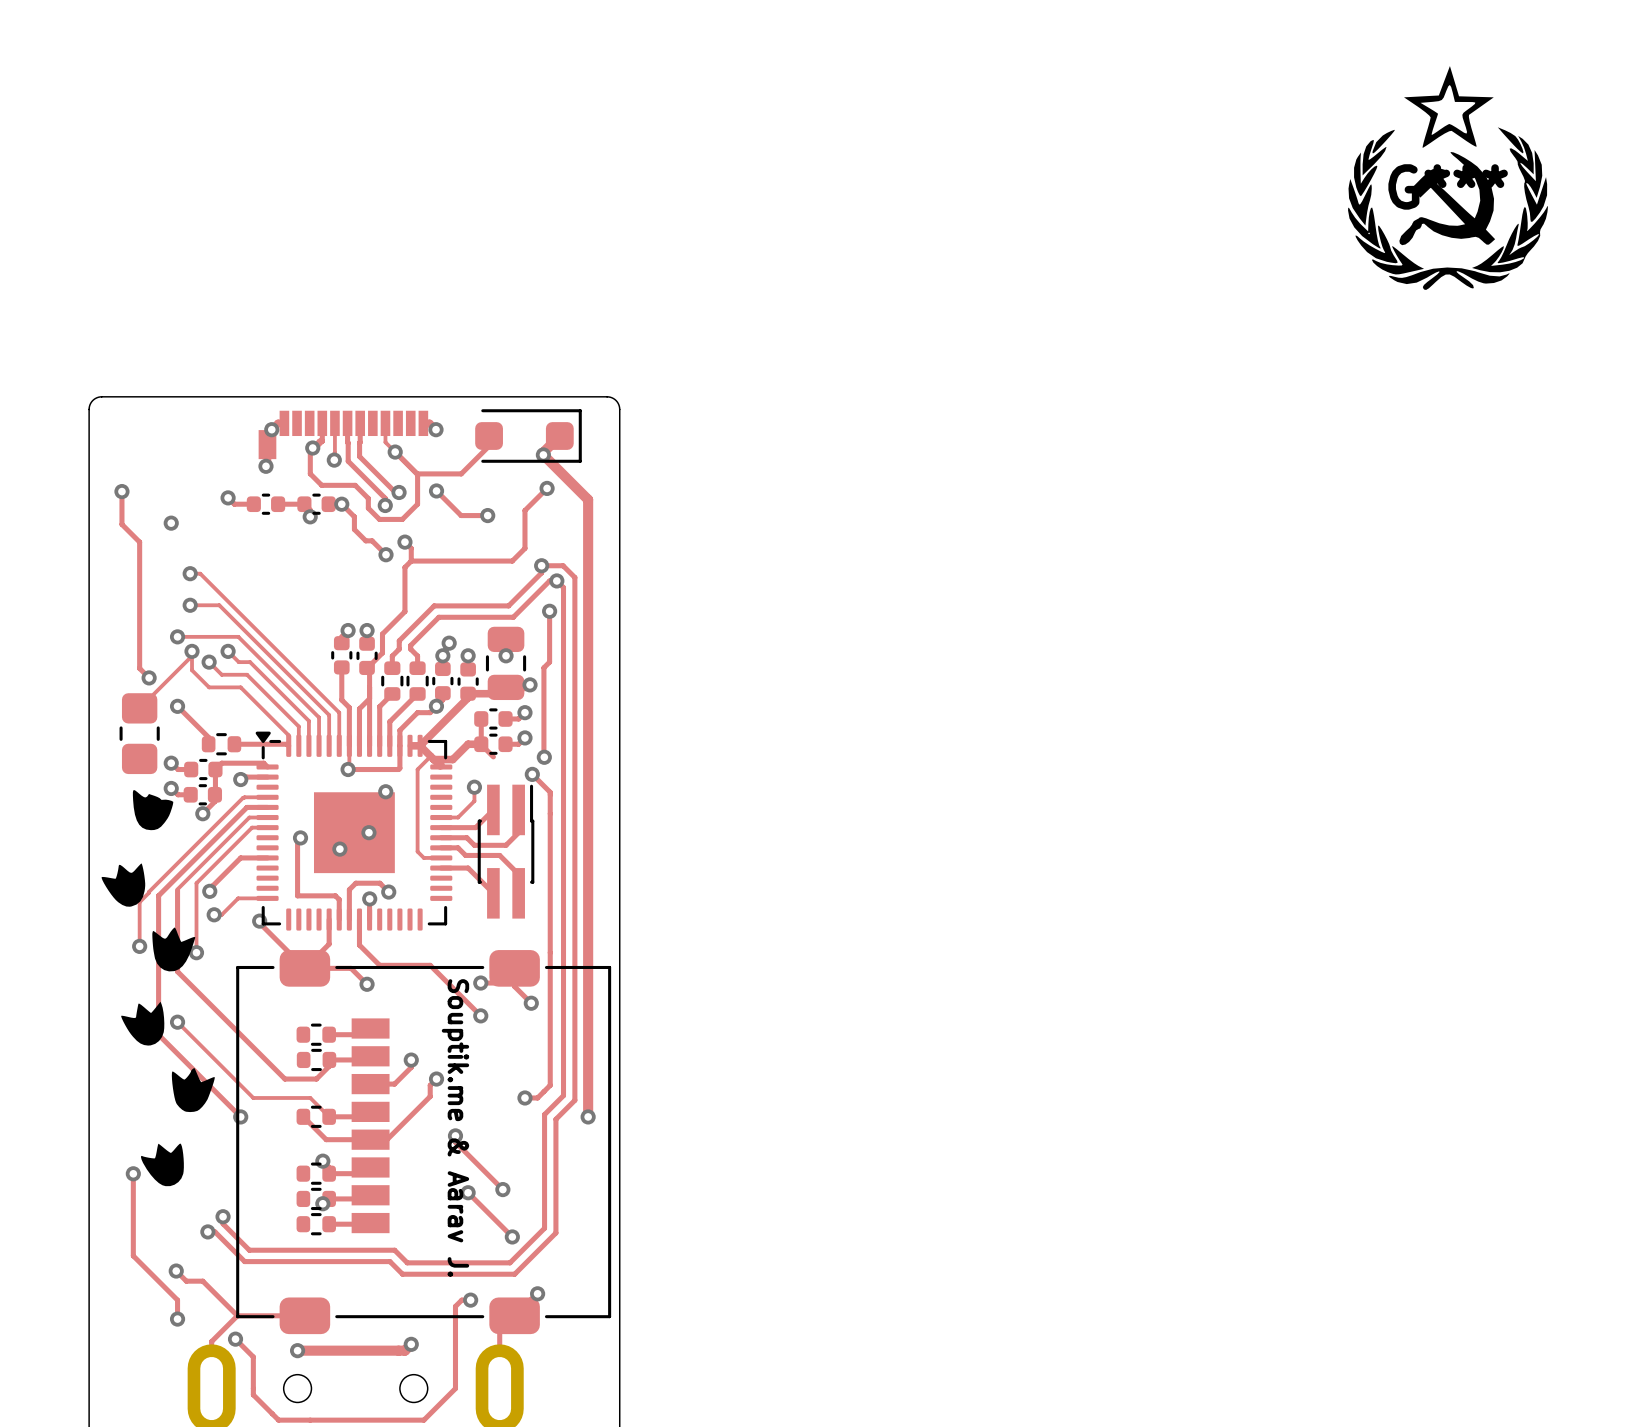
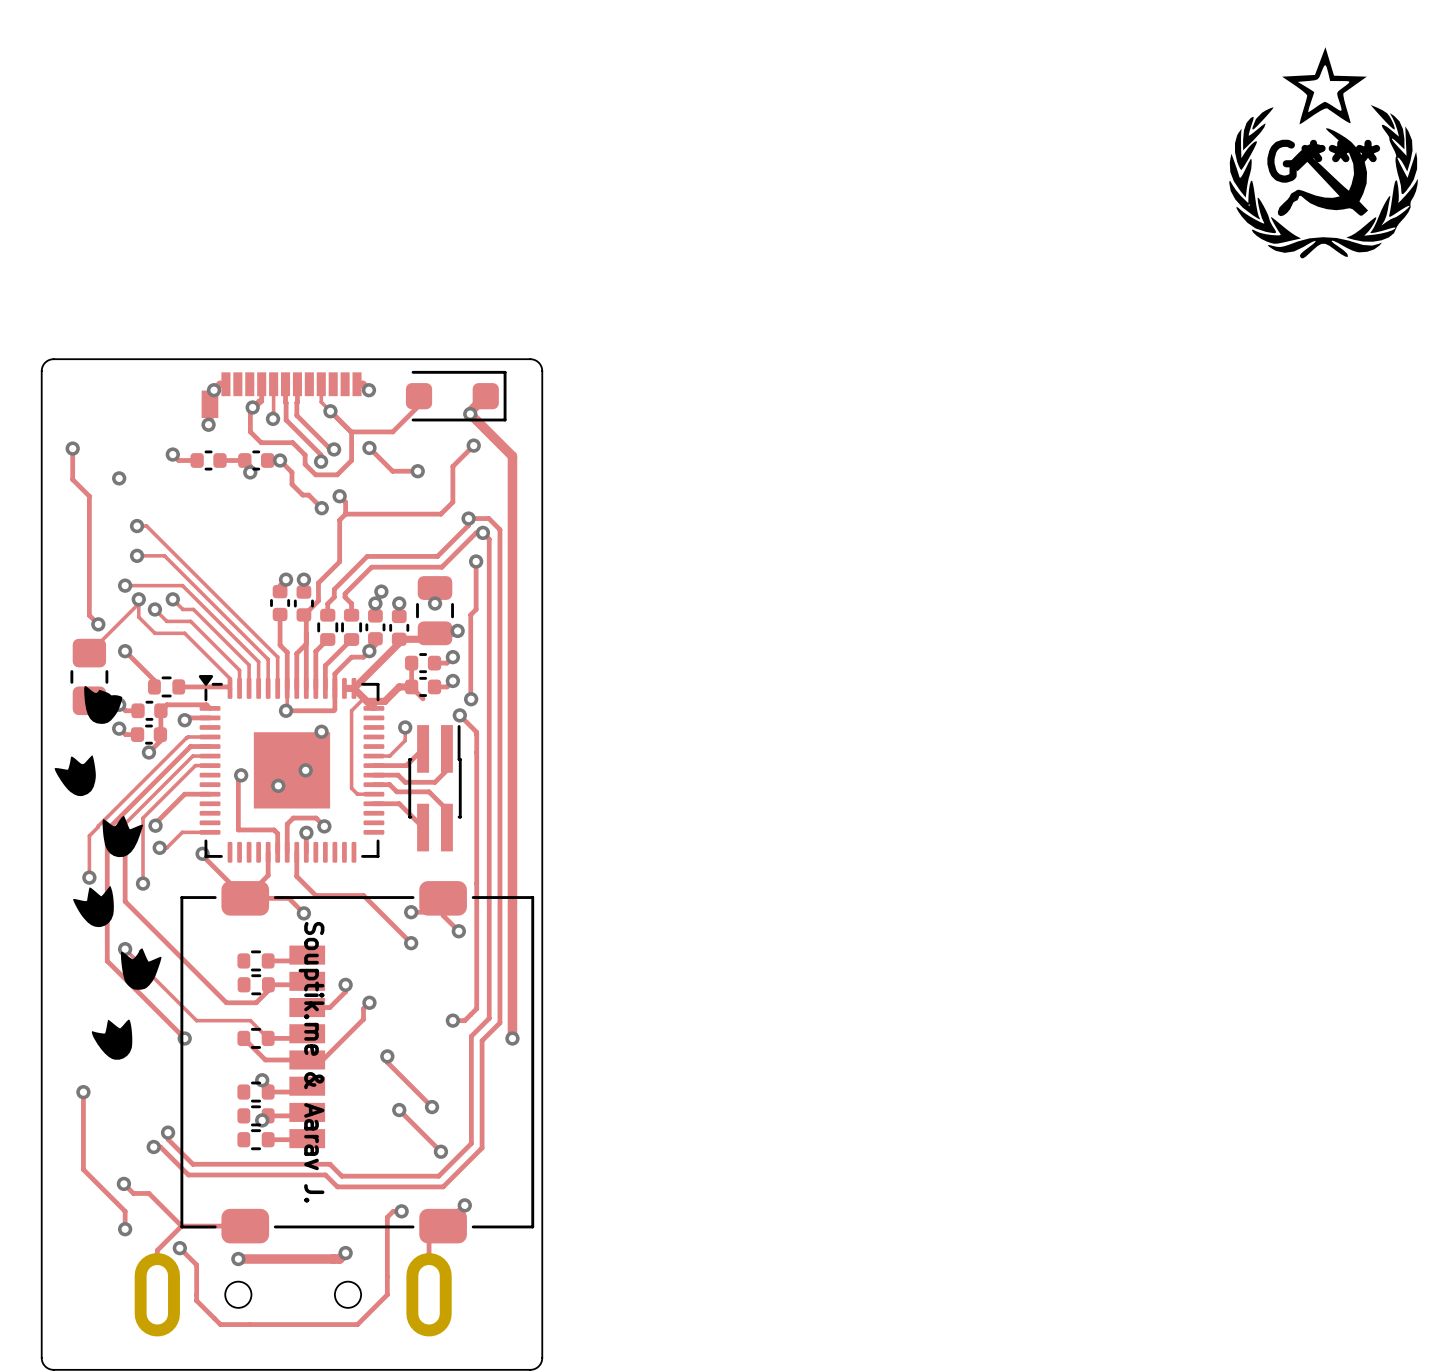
drawing position: (158, 988) -> (108, 872)
text position: Souptik.me & Aarav J. (455, 1128) -> Souptik.me & Aarav J. (311, 1062)

